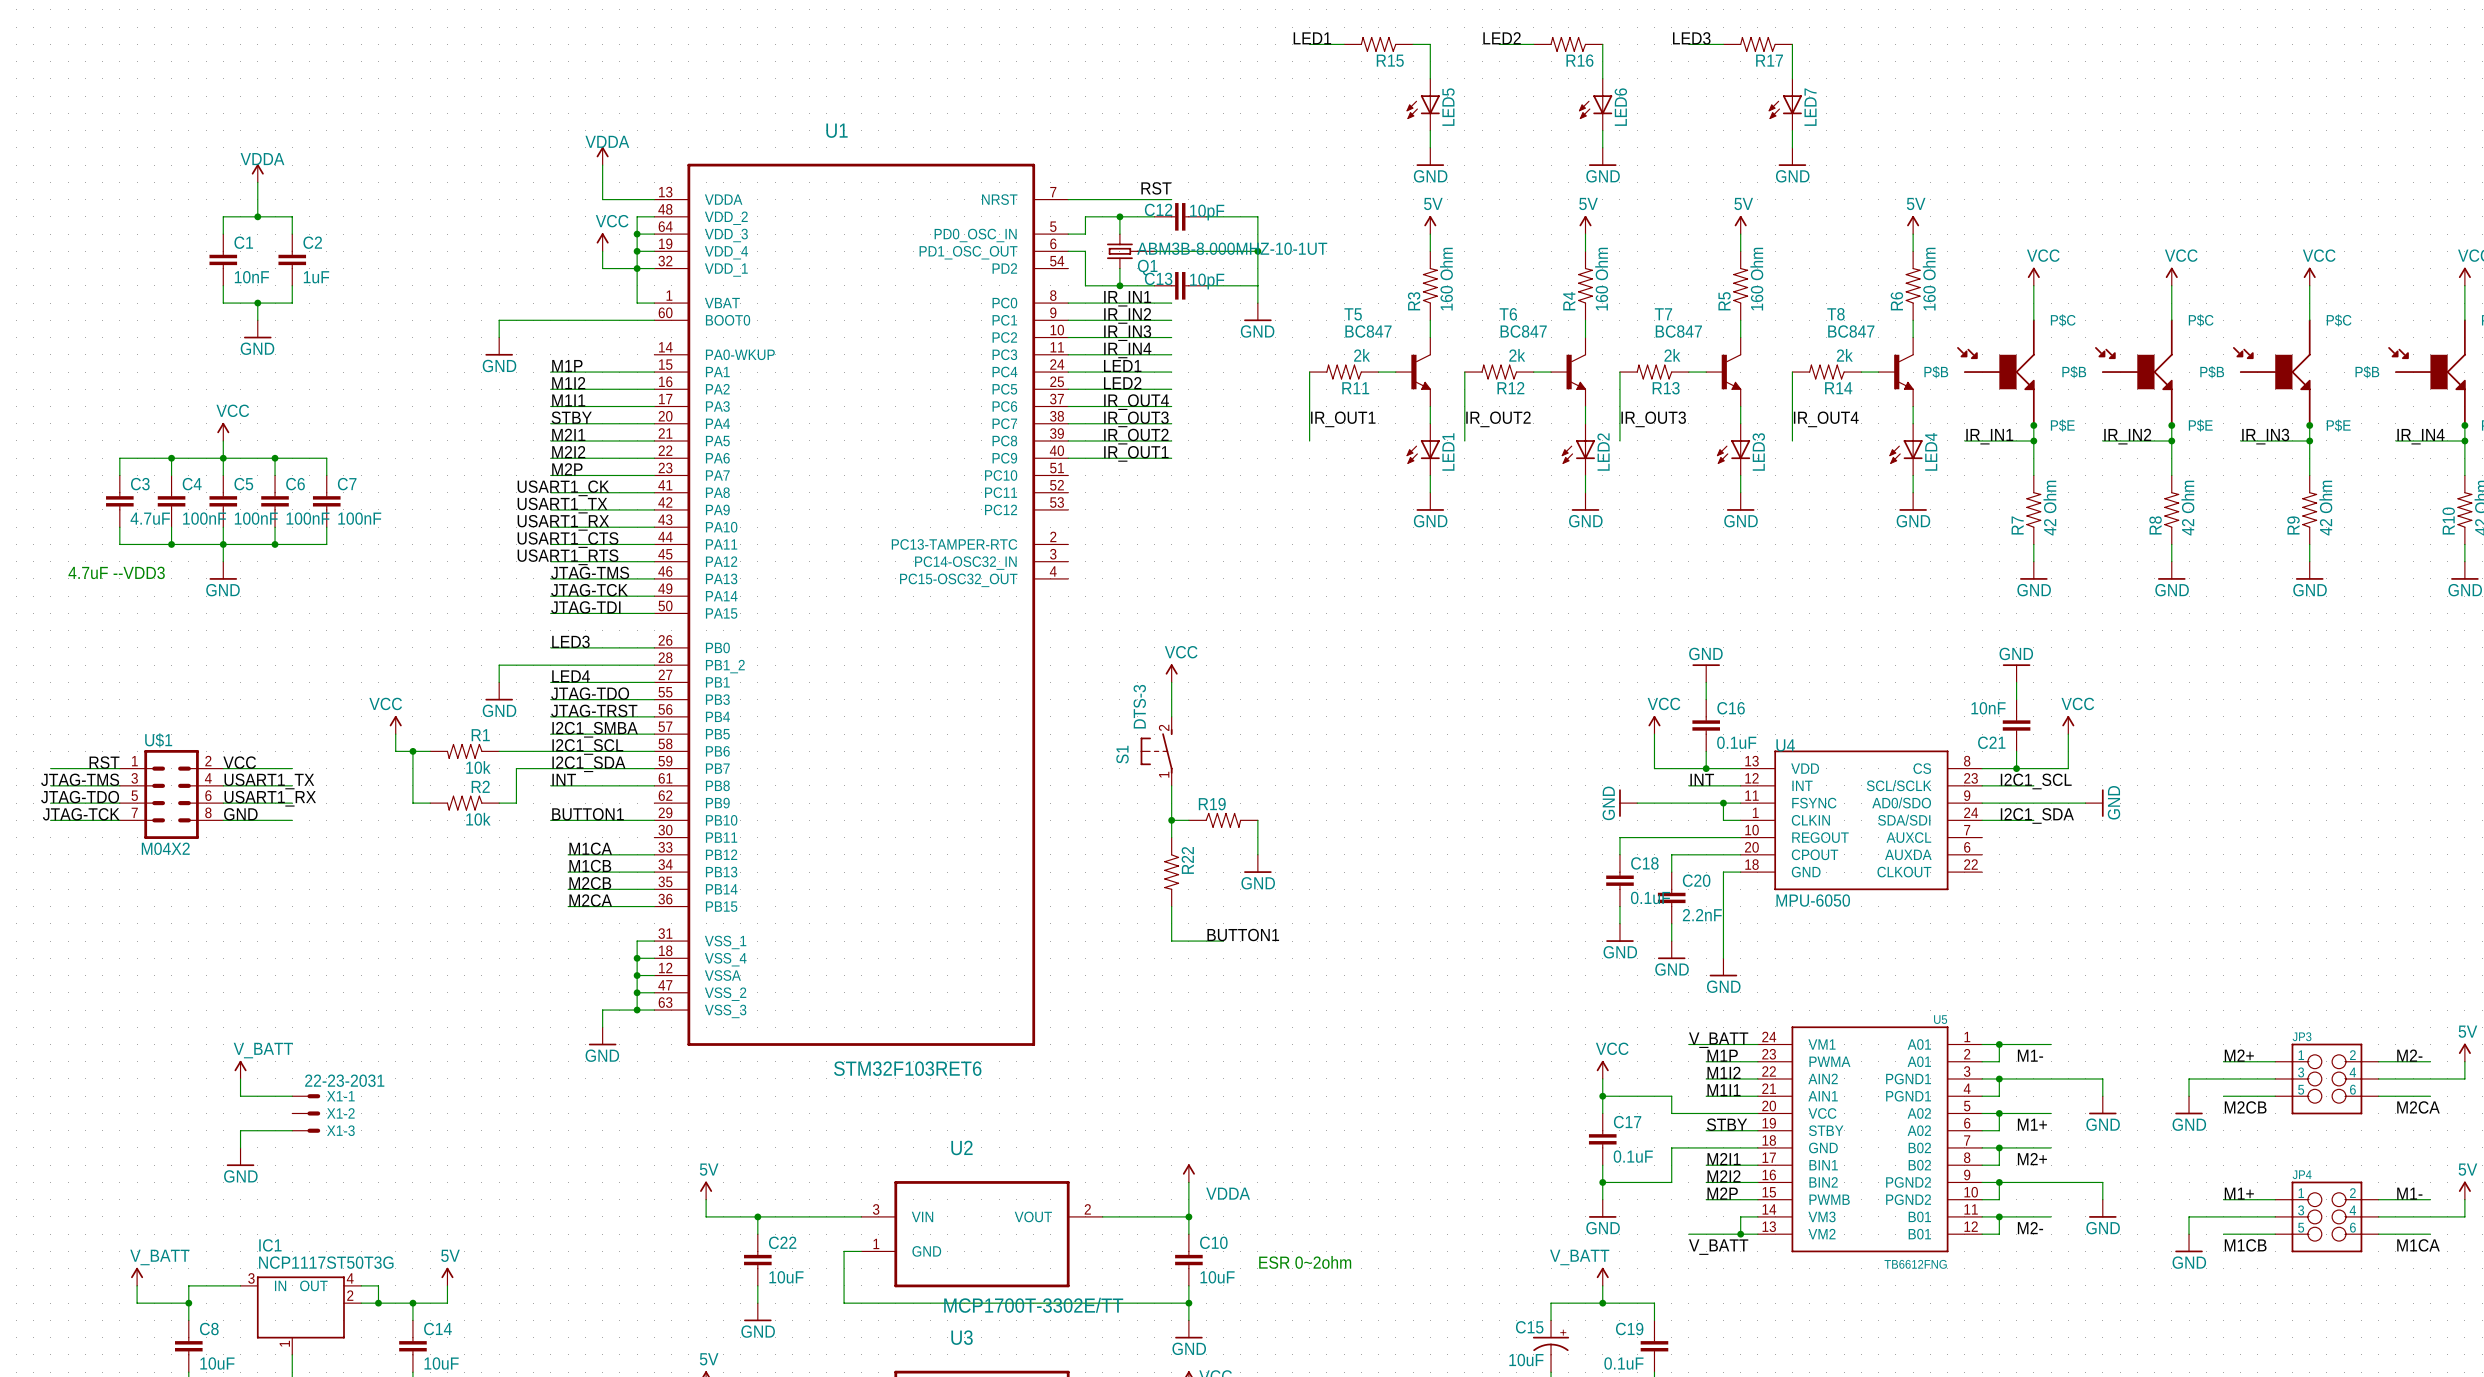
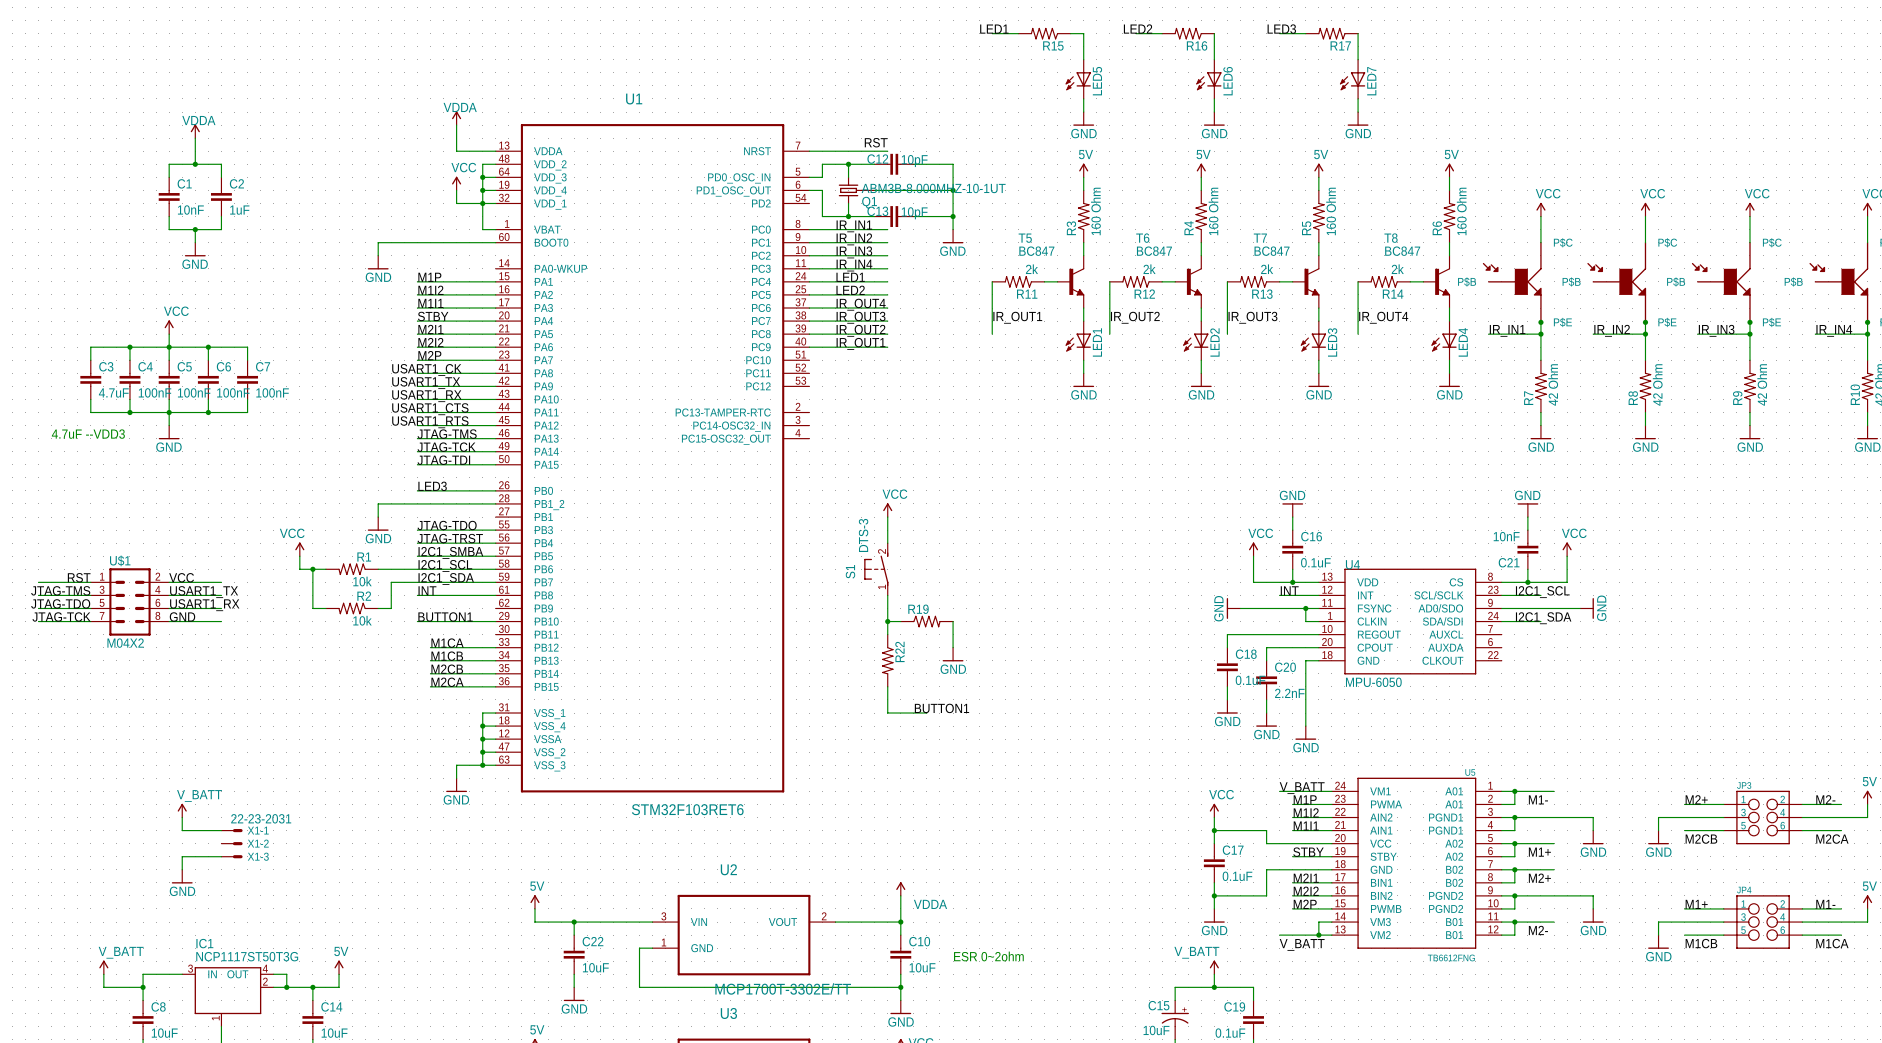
junction: none -> (953, 216)
label: LED4 (571, 676) -> none
wire: (550, 682) (654, 682) -> none

